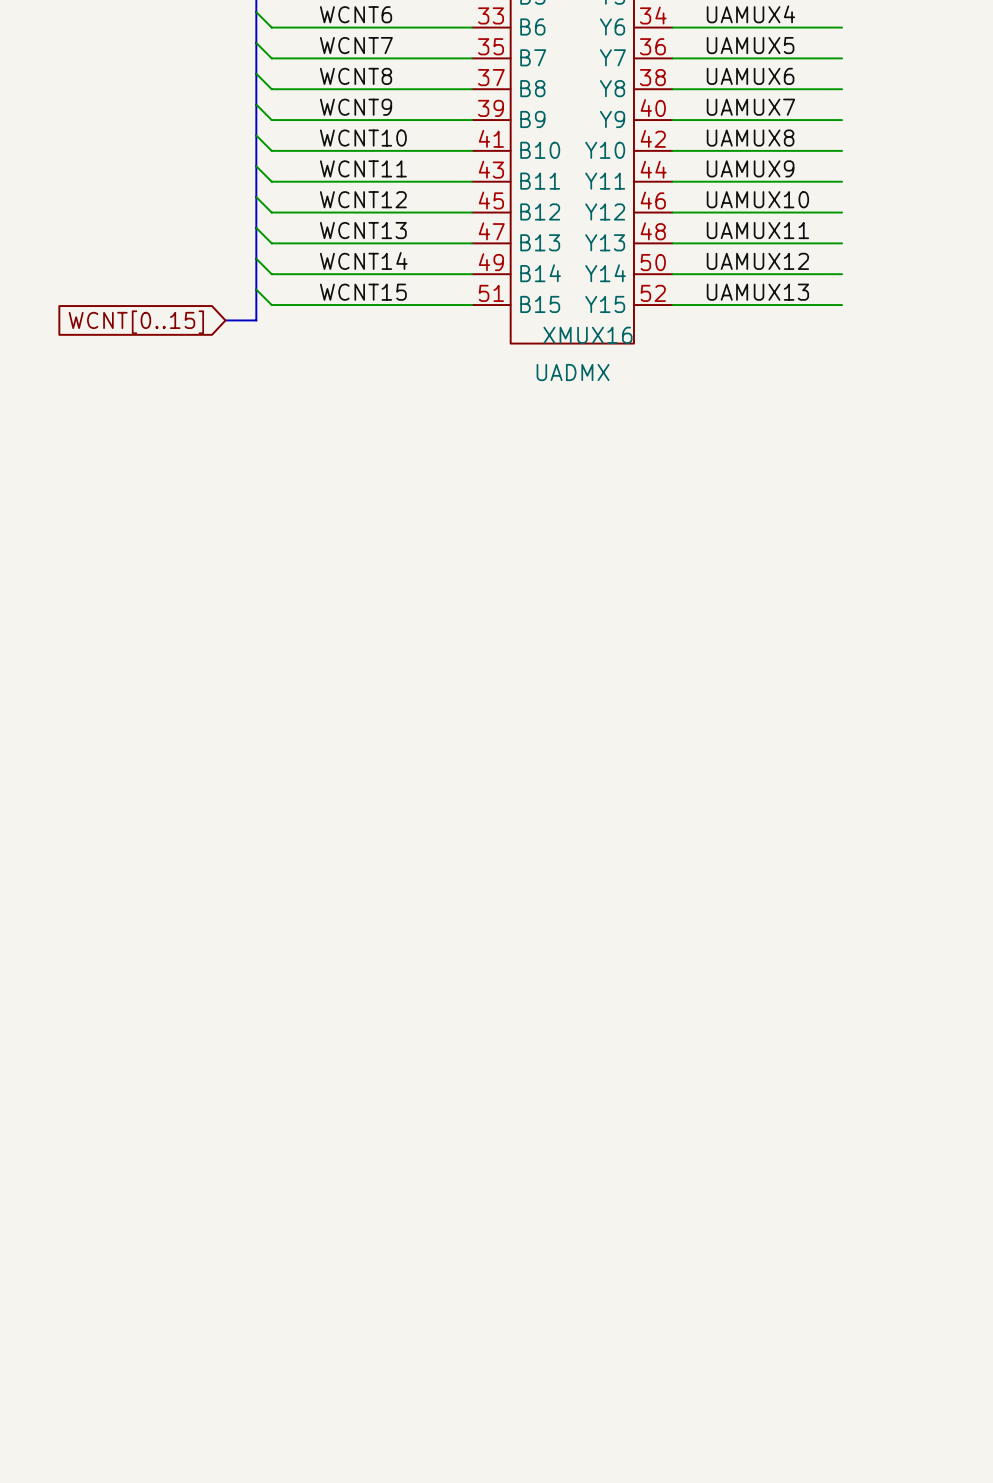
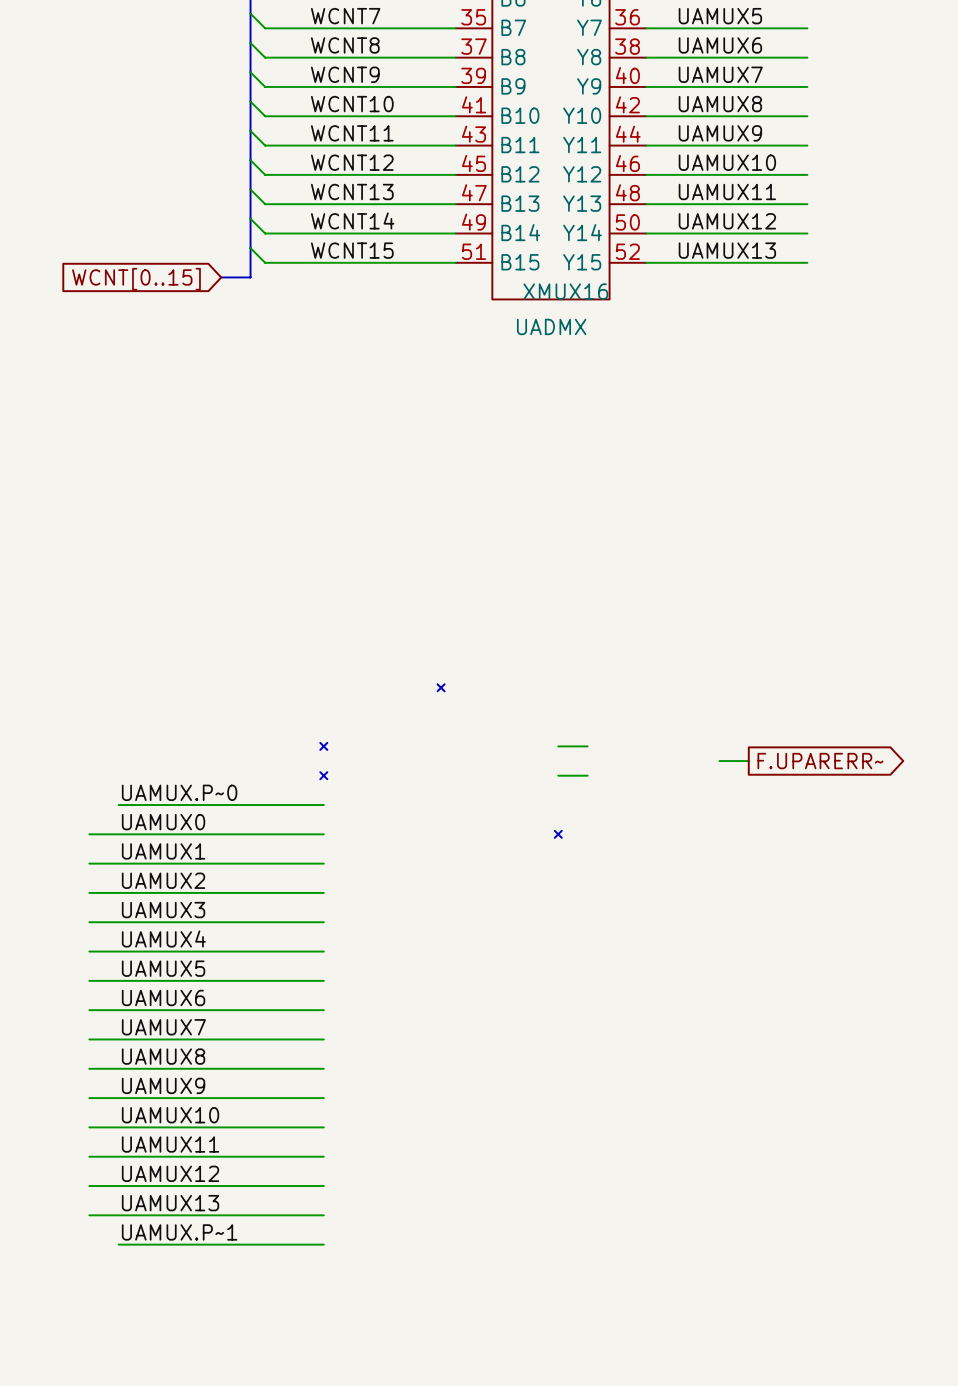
no-connect mark: none -> (441, 687)
no-connect mark: none -> (323, 746)
wire: none -> (558, 746) (587, 746)
wire: none -> (719, 761) (748, 761)
global label: none -> F.UPARERR~ (820, 761)
no-connect mark: none -> (323, 775)
wire: none -> (558, 775) (587, 775)
label: none -> UAMUX.P~0 (179, 792)
wire: none -> (118, 805) (323, 805)
label: none -> UAMUX0 (163, 822)
wire: none -> (89, 834) (323, 834)
no-connect mark: none -> (558, 834)
label: none -> UAMUX1 (163, 851)
wire: none -> (89, 863) (323, 863)
label: none -> UAMUX2 (163, 880)
wire: none -> (89, 892) (323, 892)
label: none -> UAMUX3 (163, 910)
wire: none -> (89, 922) (323, 922)
label: none -> UAMUX4 (163, 939)
wire: none -> (89, 951) (323, 951)
label: none -> UAMUX5 (163, 968)
wire: none -> (89, 980) (323, 980)
label: none -> UAMUX6 (163, 997)
wire: none -> (89, 1010) (323, 1010)
label: none -> UAMUX7 (163, 1027)
wire: none -> (89, 1039) (323, 1039)
label: none -> UAMUX8 (163, 1056)
wire: none -> (89, 1068) (323, 1068)
label: none -> UAMUX9 (163, 1085)
wire: none -> (89, 1098) (323, 1098)
label: none -> UAMUX10 (170, 1115)
wire: none -> (89, 1127) (323, 1127)
label: none -> UAMUX11 (170, 1144)
wire: none -> (89, 1156) (323, 1156)
label: none -> UAMUX12 (170, 1173)
wire: none -> (89, 1186) (323, 1186)
label: none -> UAMUX13 (170, 1203)
wire: none -> (89, 1215) (323, 1215)
label: none -> UAMUX.P~1 (179, 1232)
wire: none -> (118, 1244) (323, 1244)

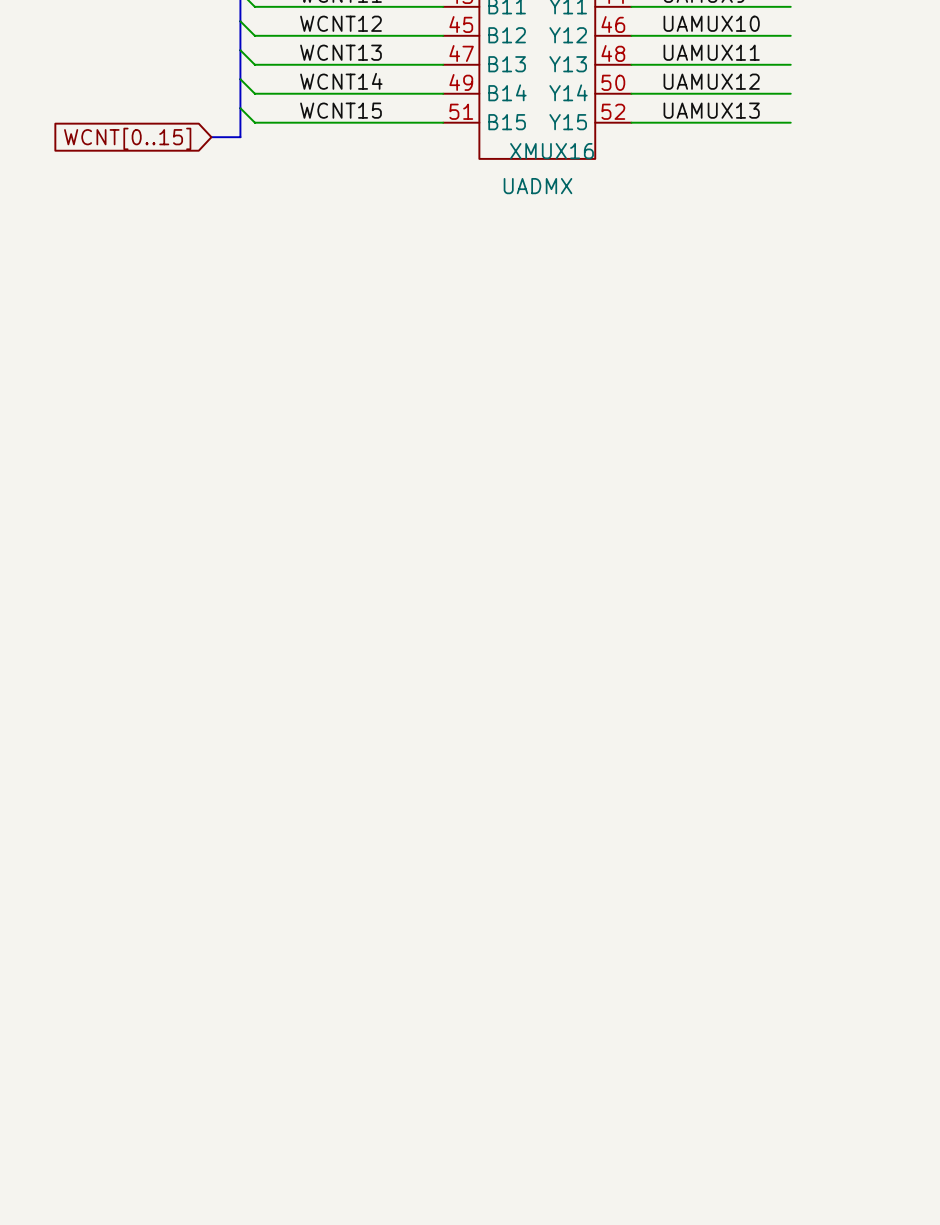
no-connect mark: (441, 687) -> none
no-connect mark: (323, 746) -> none
wire: (558, 746) (587, 746) -> none
wire: (719, 761) (748, 761) -> none
global label: F.UPARERR~ (820, 761) -> none
no-connect mark: (323, 775) -> none
wire: (558, 775) (587, 775) -> none
label: UAMUX.P~0 (179, 792) -> none
wire: (118, 805) (323, 805) -> none
label: UAMUX0 (163, 822) -> none
wire: (89, 834) (323, 834) -> none
no-connect mark: (558, 834) -> none
label: UAMUX1 (163, 851) -> none
wire: (89, 863) (323, 863) -> none
label: UAMUX2 (163, 880) -> none
wire: (89, 892) (323, 892) -> none
label: UAMUX3 (163, 910) -> none
wire: (89, 922) (323, 922) -> none
label: UAMUX4 (163, 939) -> none
wire: (89, 951) (323, 951) -> none
label: UAMUX5 (163, 968) -> none
wire: (89, 980) (323, 980) -> none
label: UAMUX6 (163, 997) -> none
wire: (89, 1010) (323, 1010) -> none
label: UAMUX7 (163, 1027) -> none
wire: (89, 1039) (323, 1039) -> none
label: UAMUX8 (163, 1056) -> none
wire: (89, 1068) (323, 1068) -> none
label: UAMUX9 (163, 1085) -> none
wire: (89, 1098) (323, 1098) -> none
label: UAMUX10 (170, 1115) -> none
wire: (89, 1127) (323, 1127) -> none
label: UAMUX11 (170, 1144) -> none
wire: (89, 1156) (323, 1156) -> none
label: UAMUX12 (170, 1173) -> none
wire: (89, 1186) (323, 1186) -> none
label: UAMUX13 (170, 1203) -> none
wire: (89, 1215) (323, 1215) -> none
label: UAMUX.P~1 (179, 1232) -> none
wire: (118, 1244) (323, 1244) -> none

